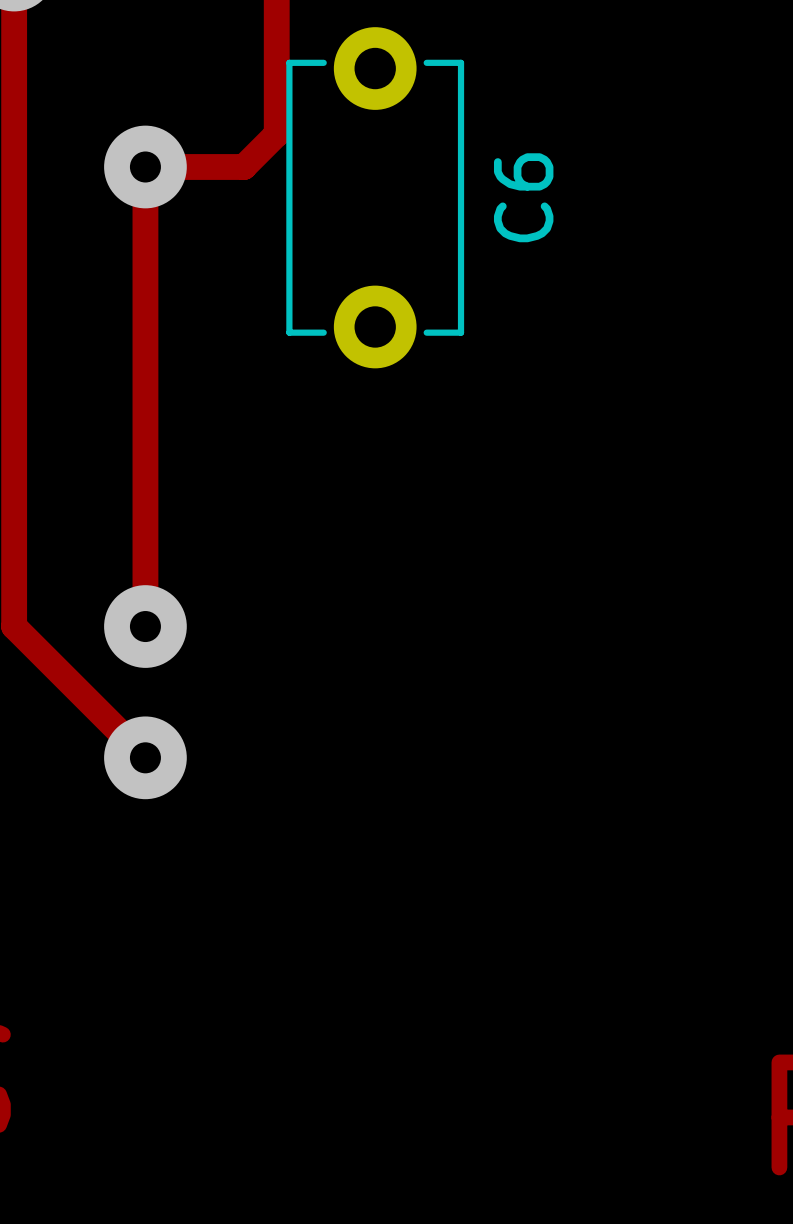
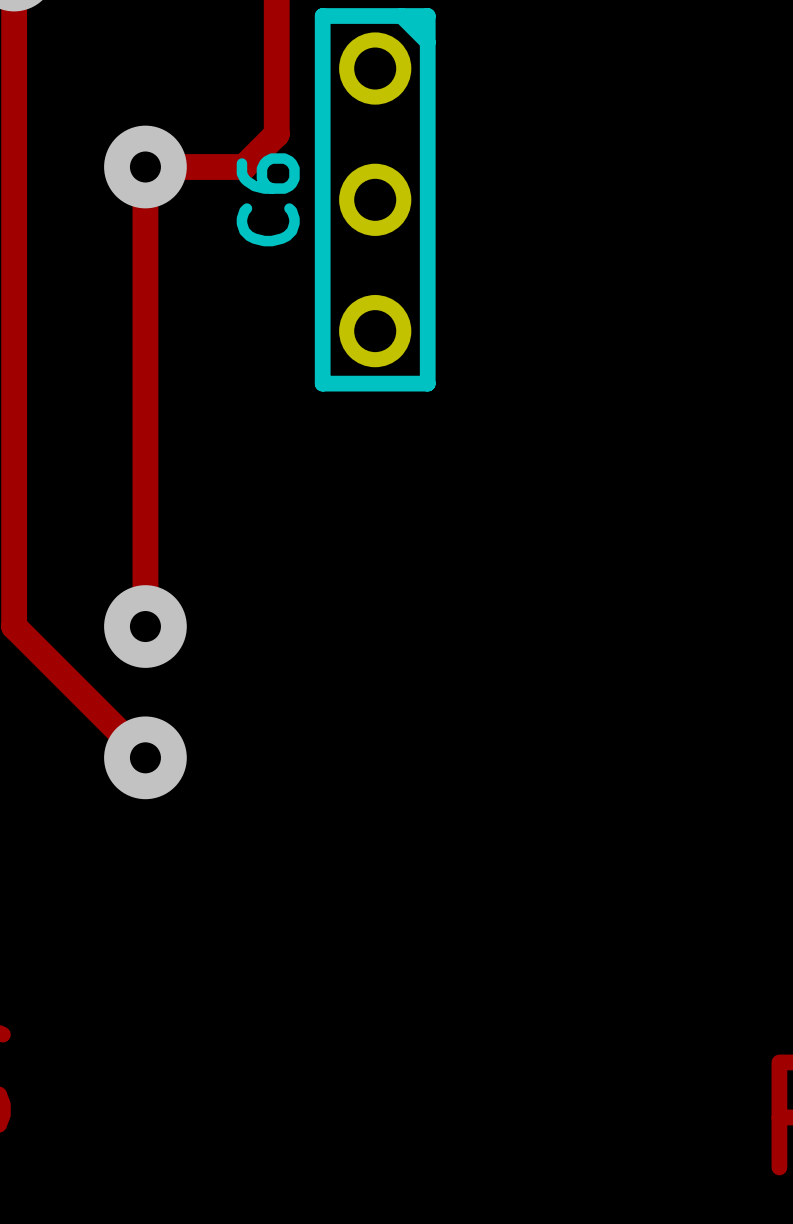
C6 footprint: [286, 27, 465, 369] -> [314, 8, 436, 392]
C6 name position: C6 (523, 197) -> C6 (268, 199)

